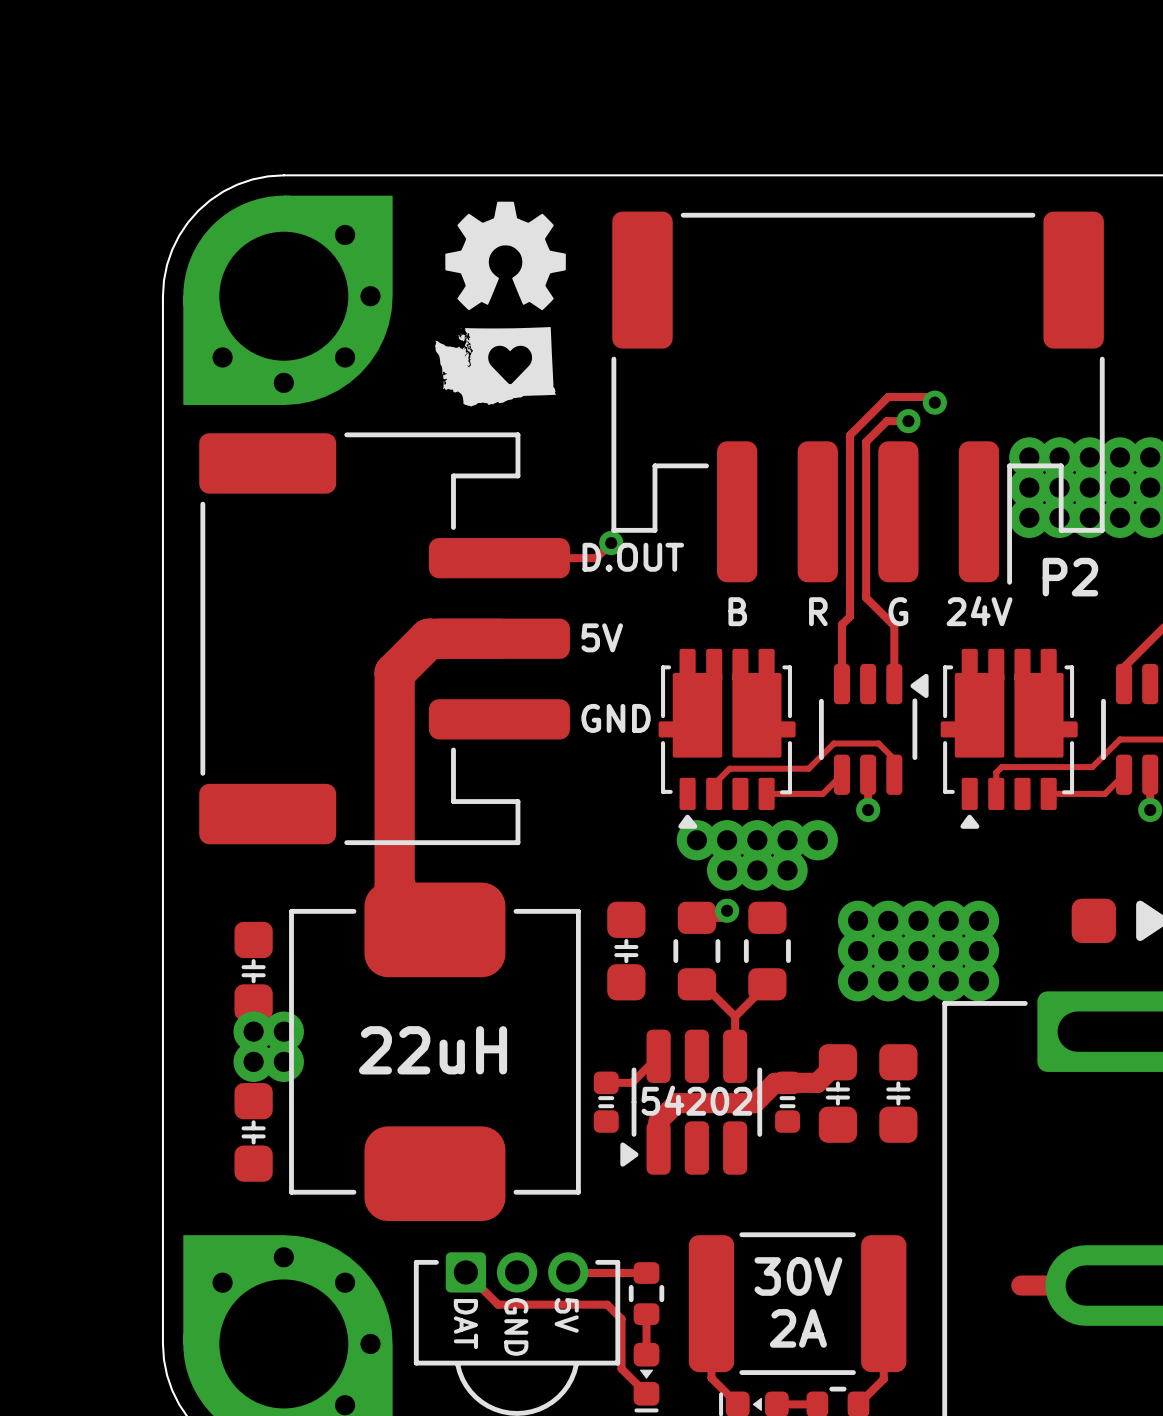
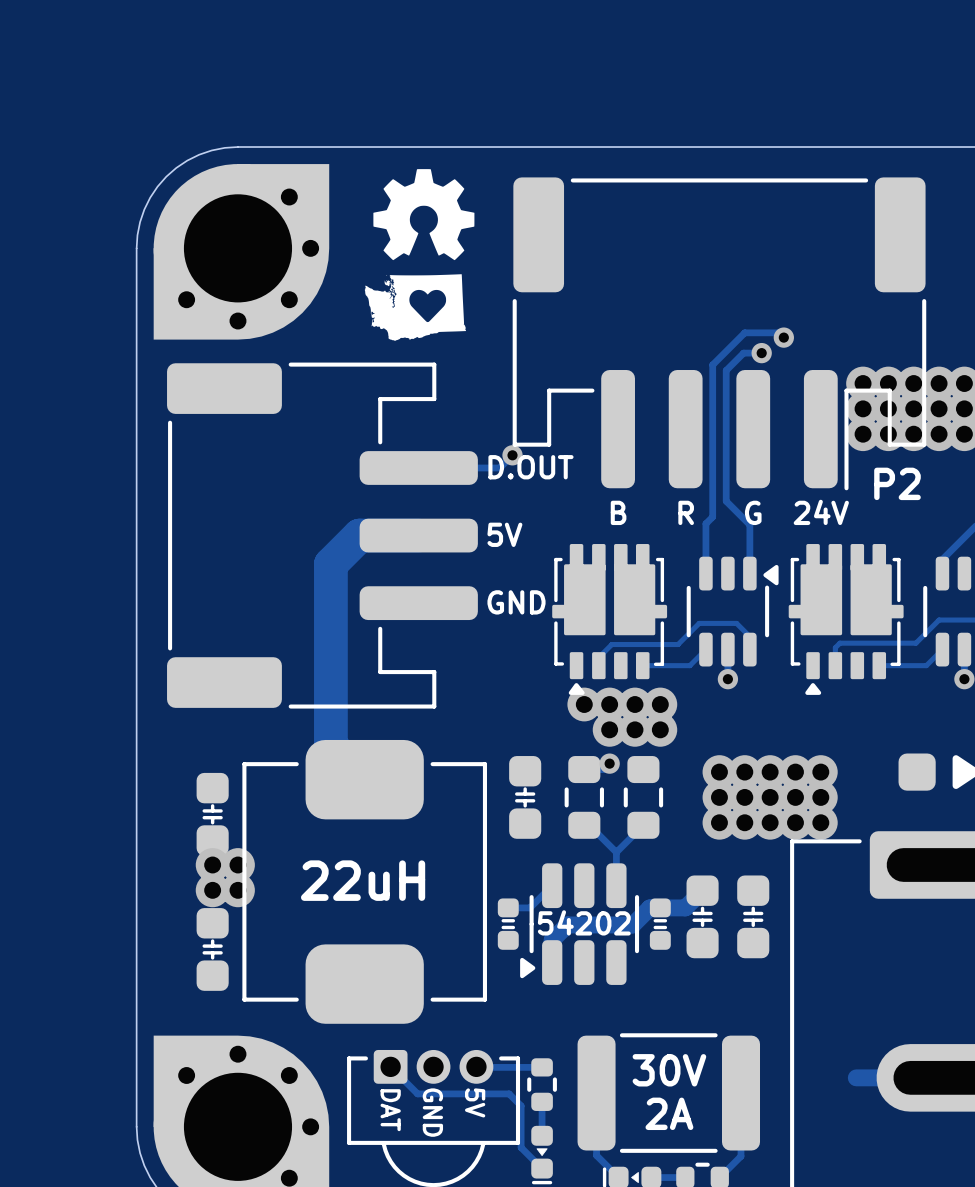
via: (817, 840) -> none

